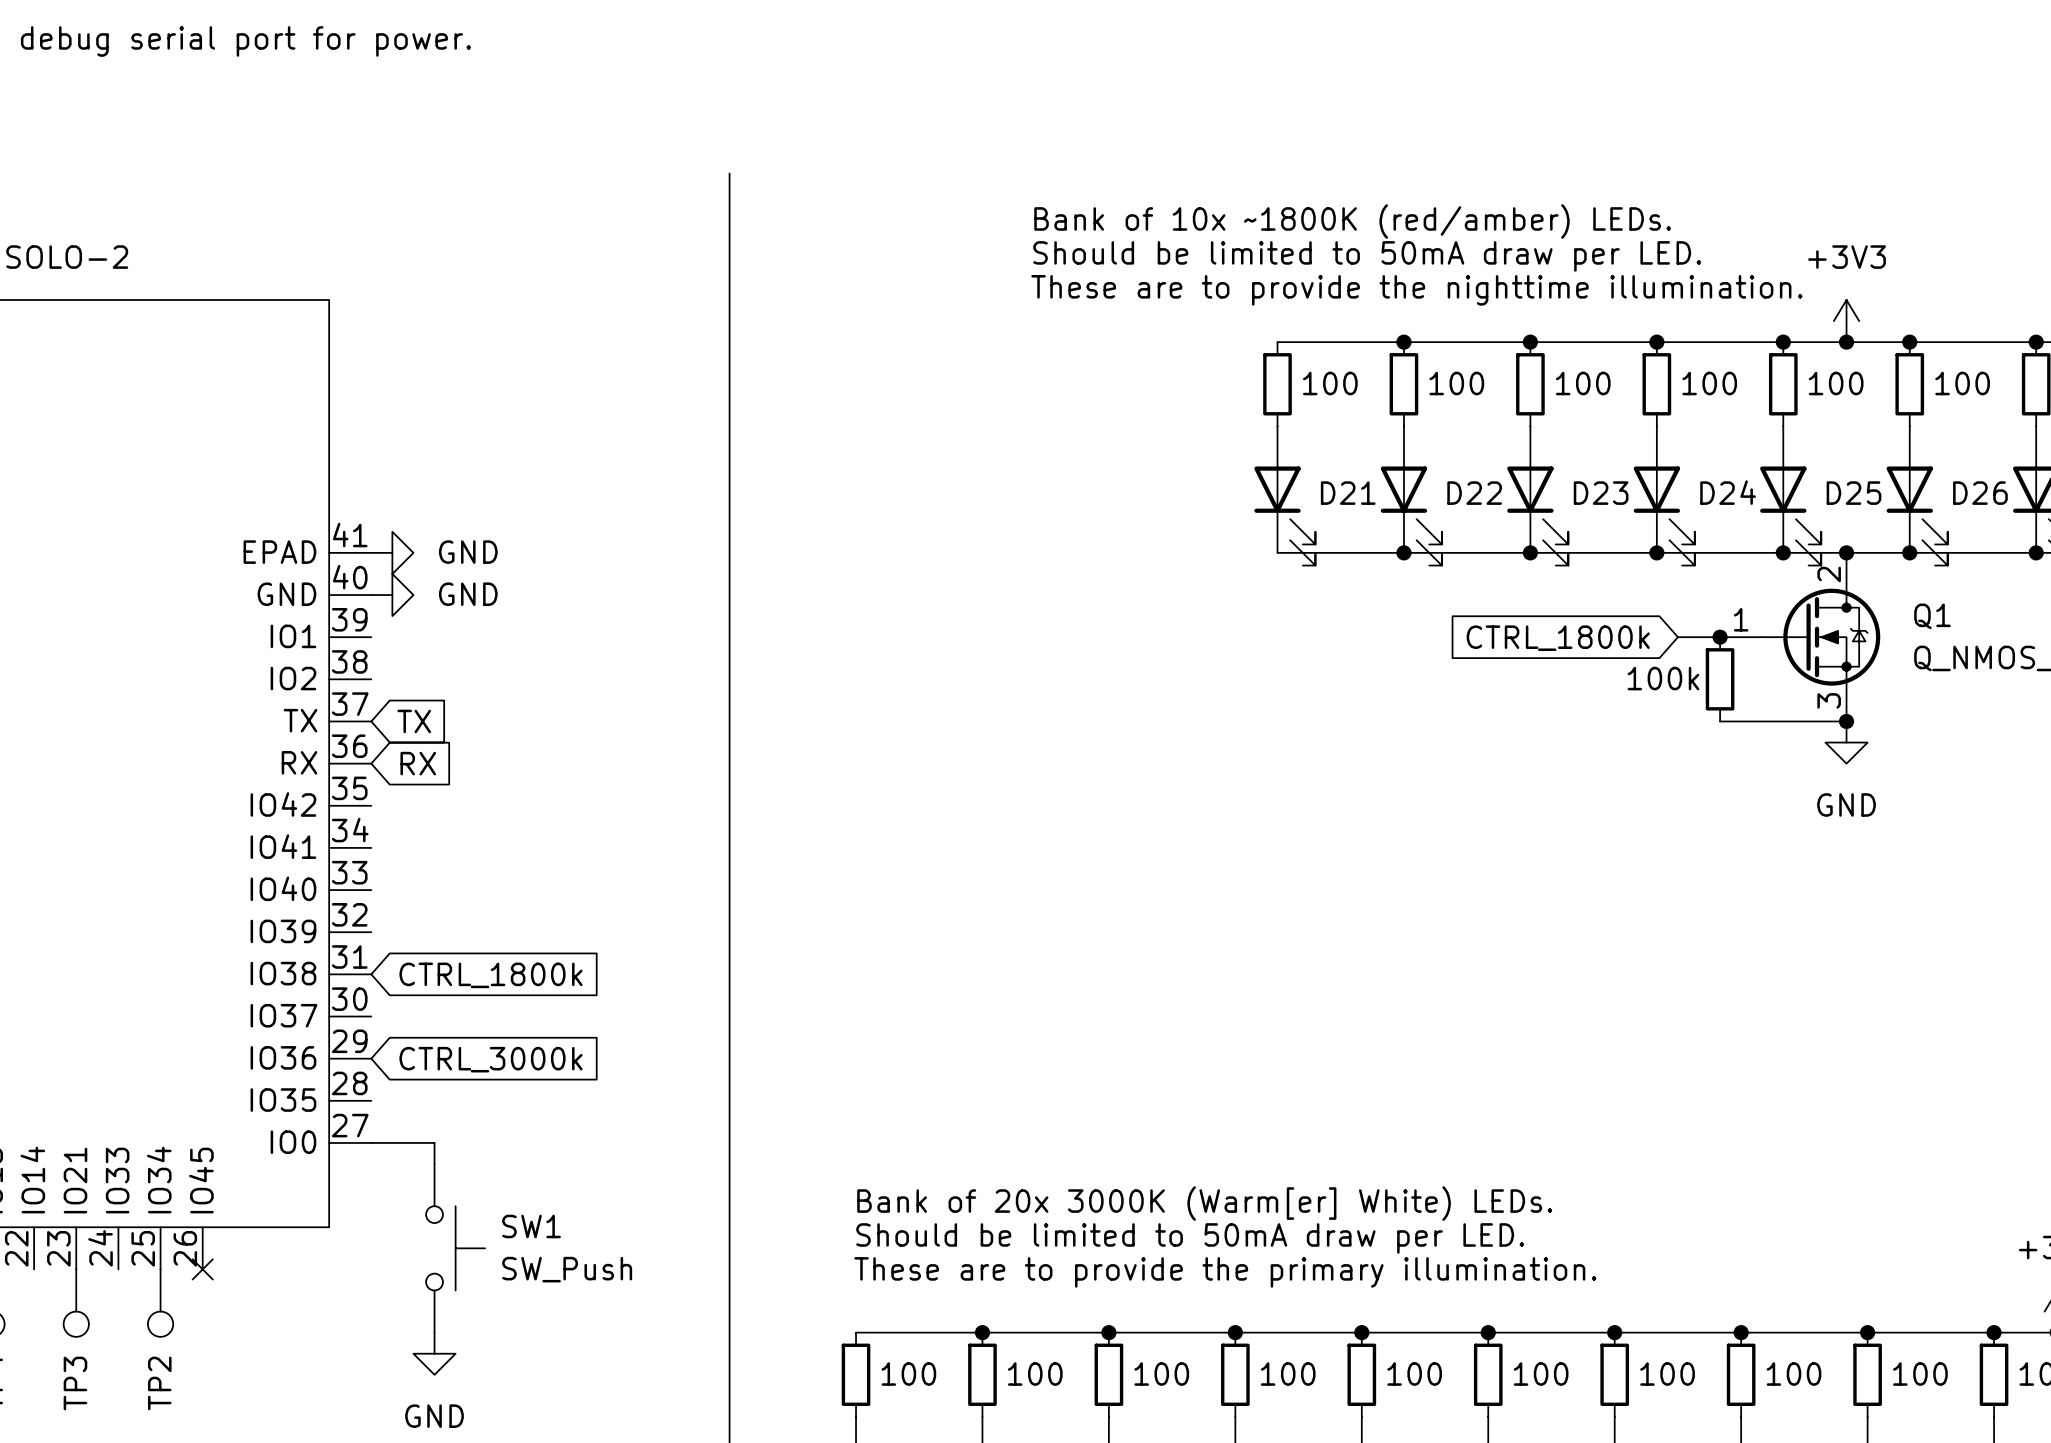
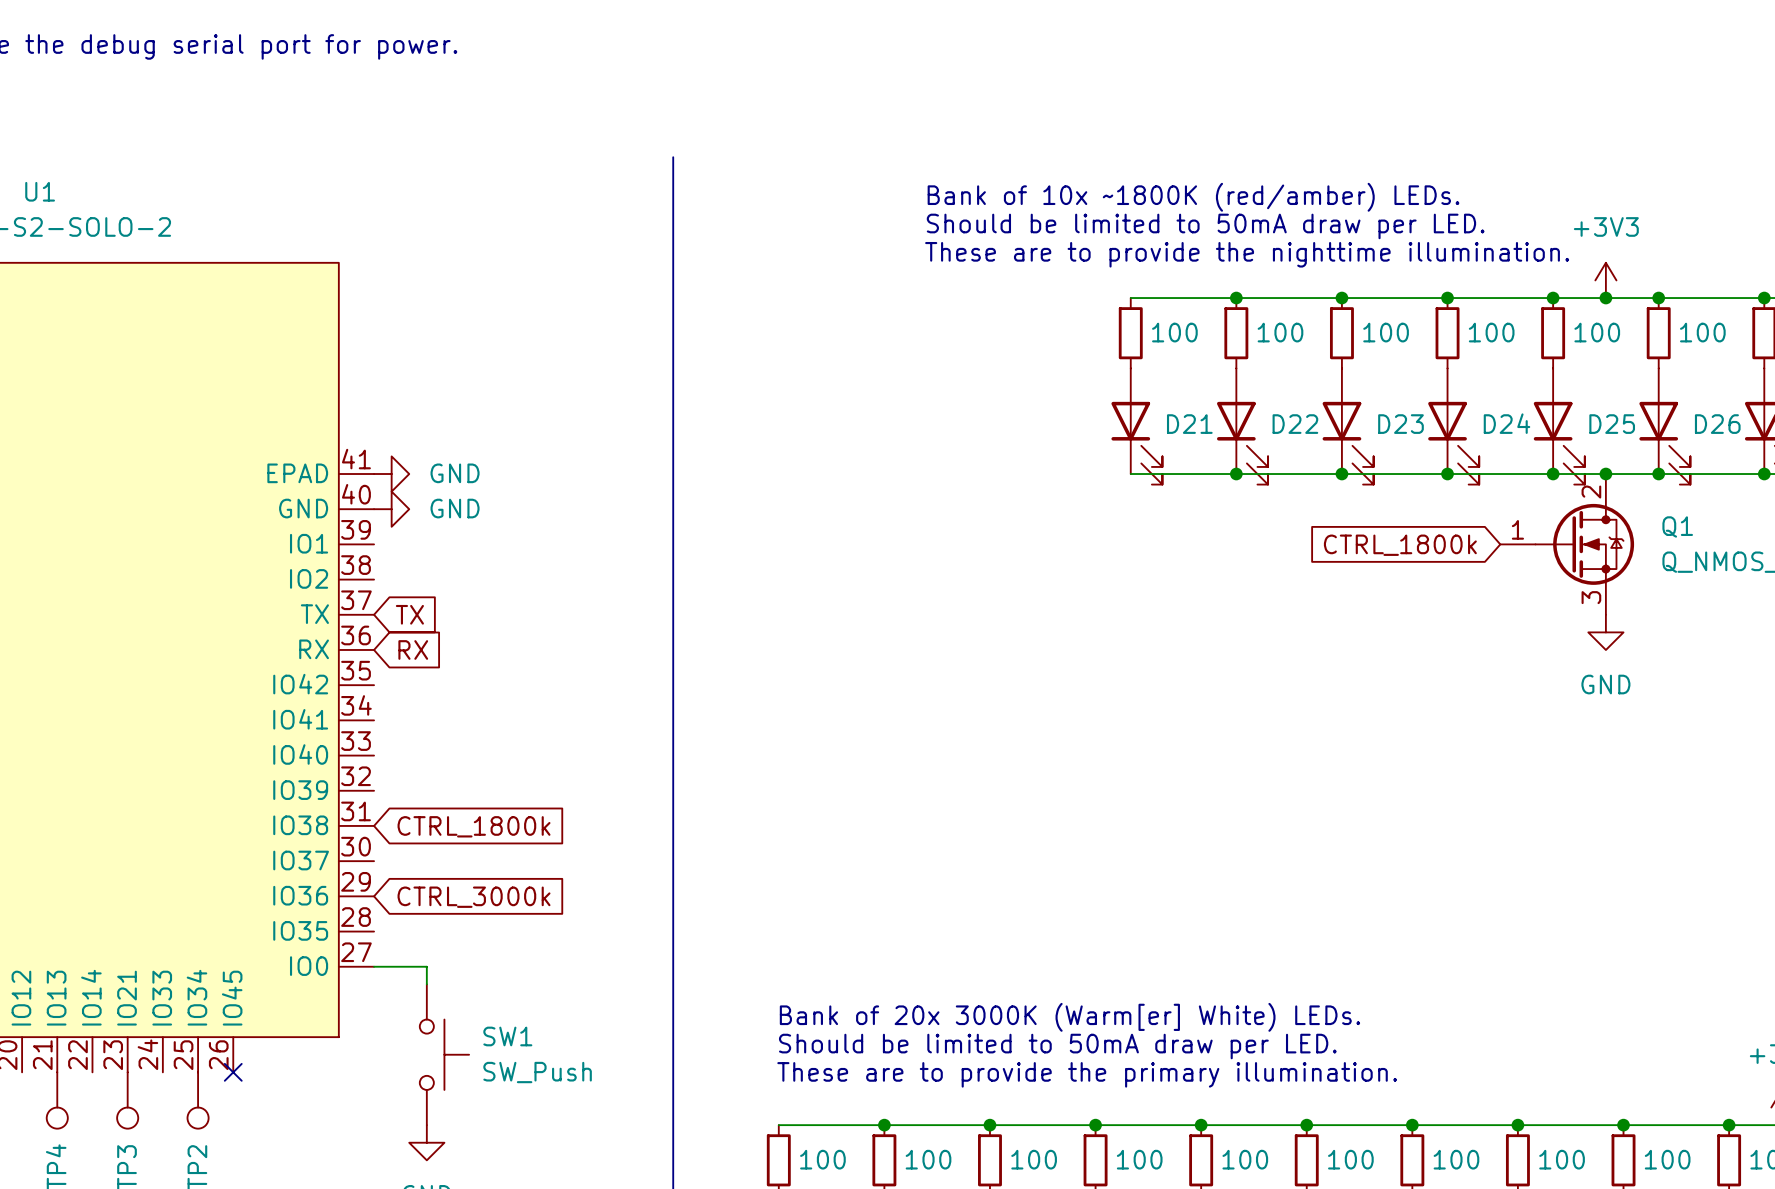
wire: (1677, 637) (1720, 637) -> none
junction: (1720, 637) -> none
global label position: CTRL_1800k (1558, 638) -> CTRL_1800k (1400, 545)
part: 100k (1720, 679) -> none
wire: (1720, 721) (1846, 721) -> none
junction: (1846, 721) -> none

